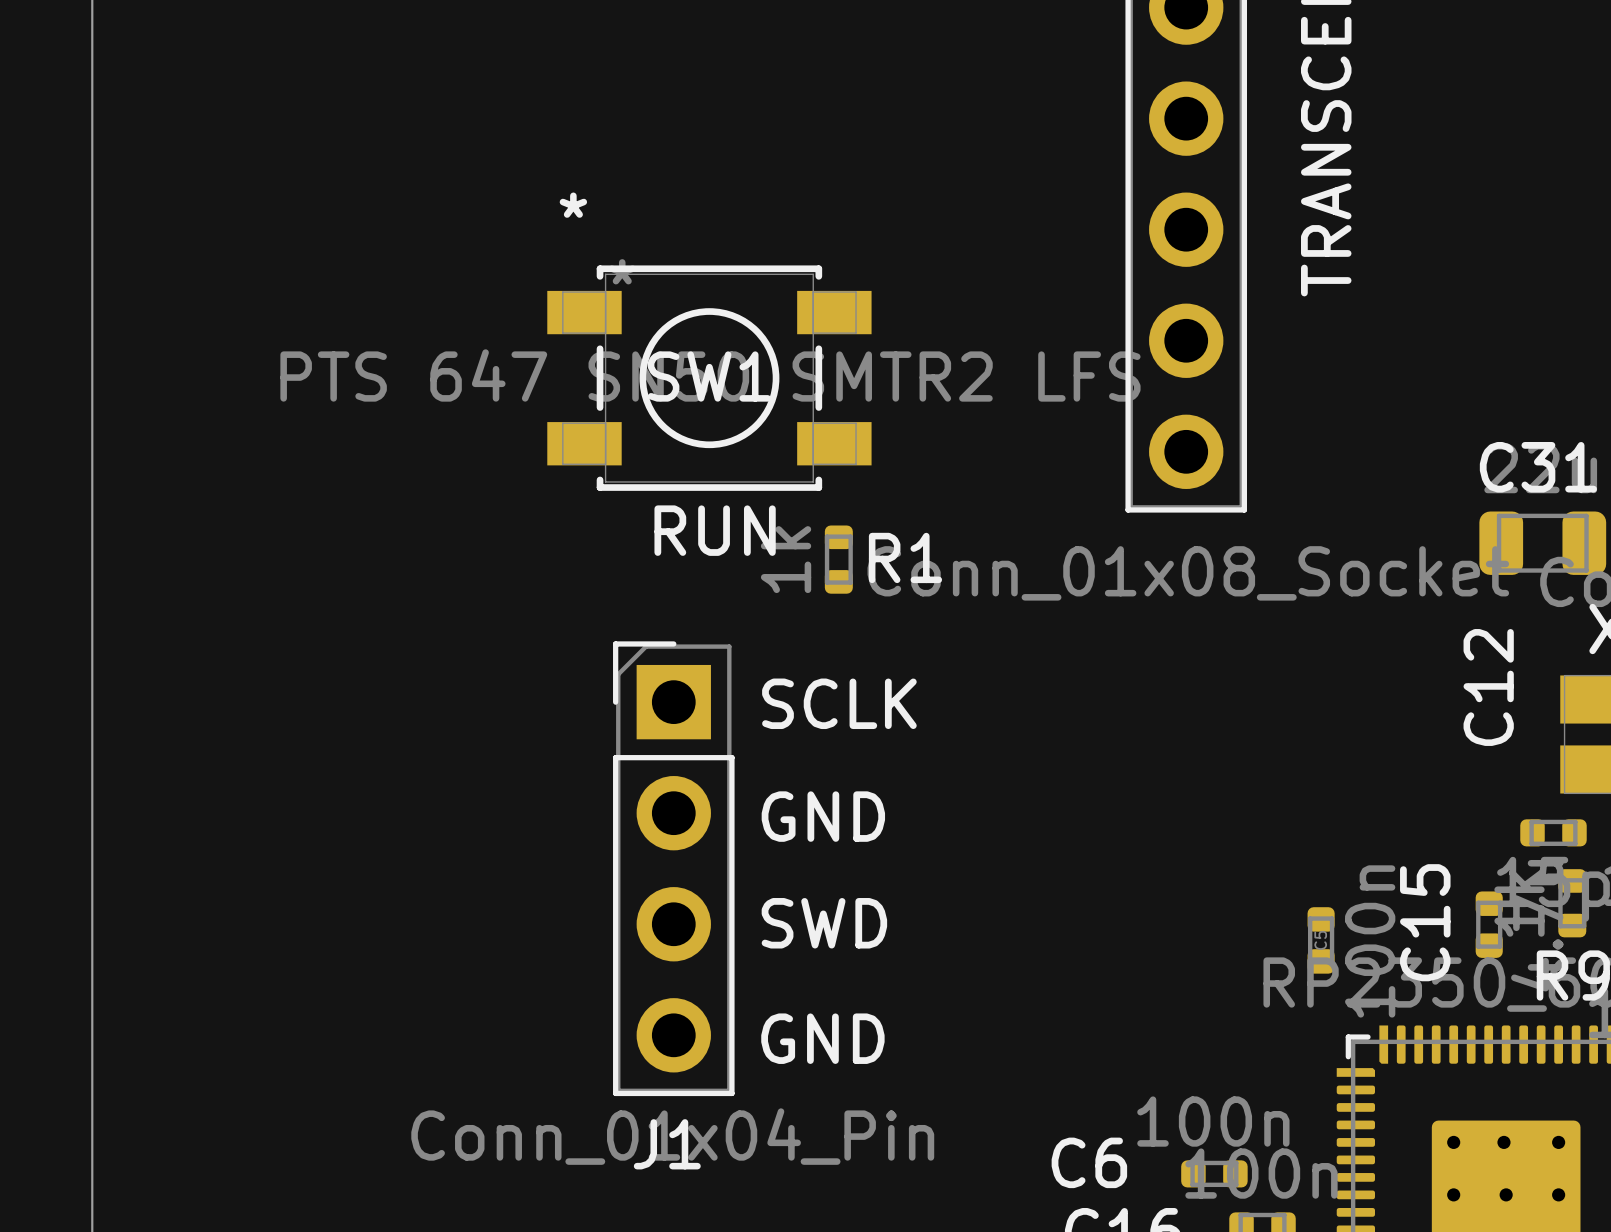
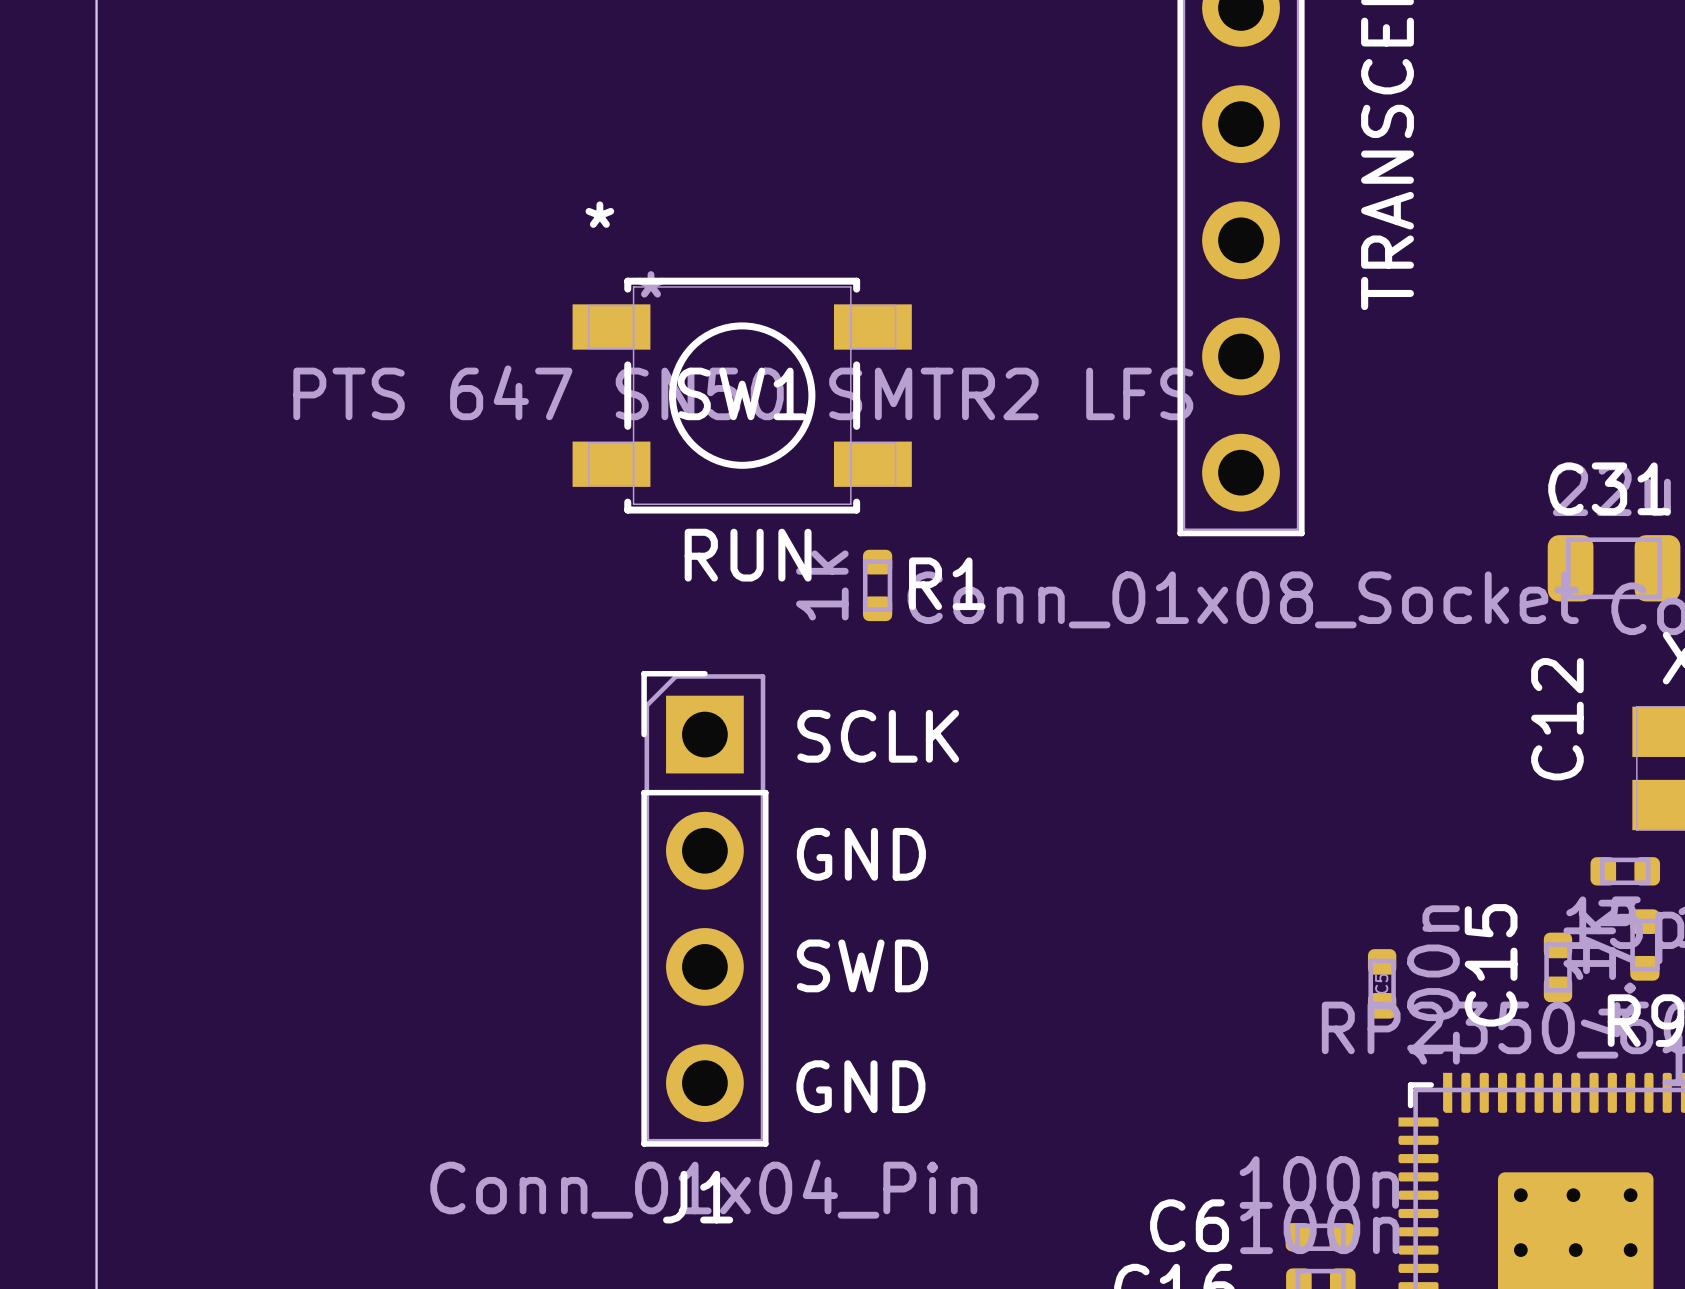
C6 position: (1214, 1173) -> (1320, 1237)

